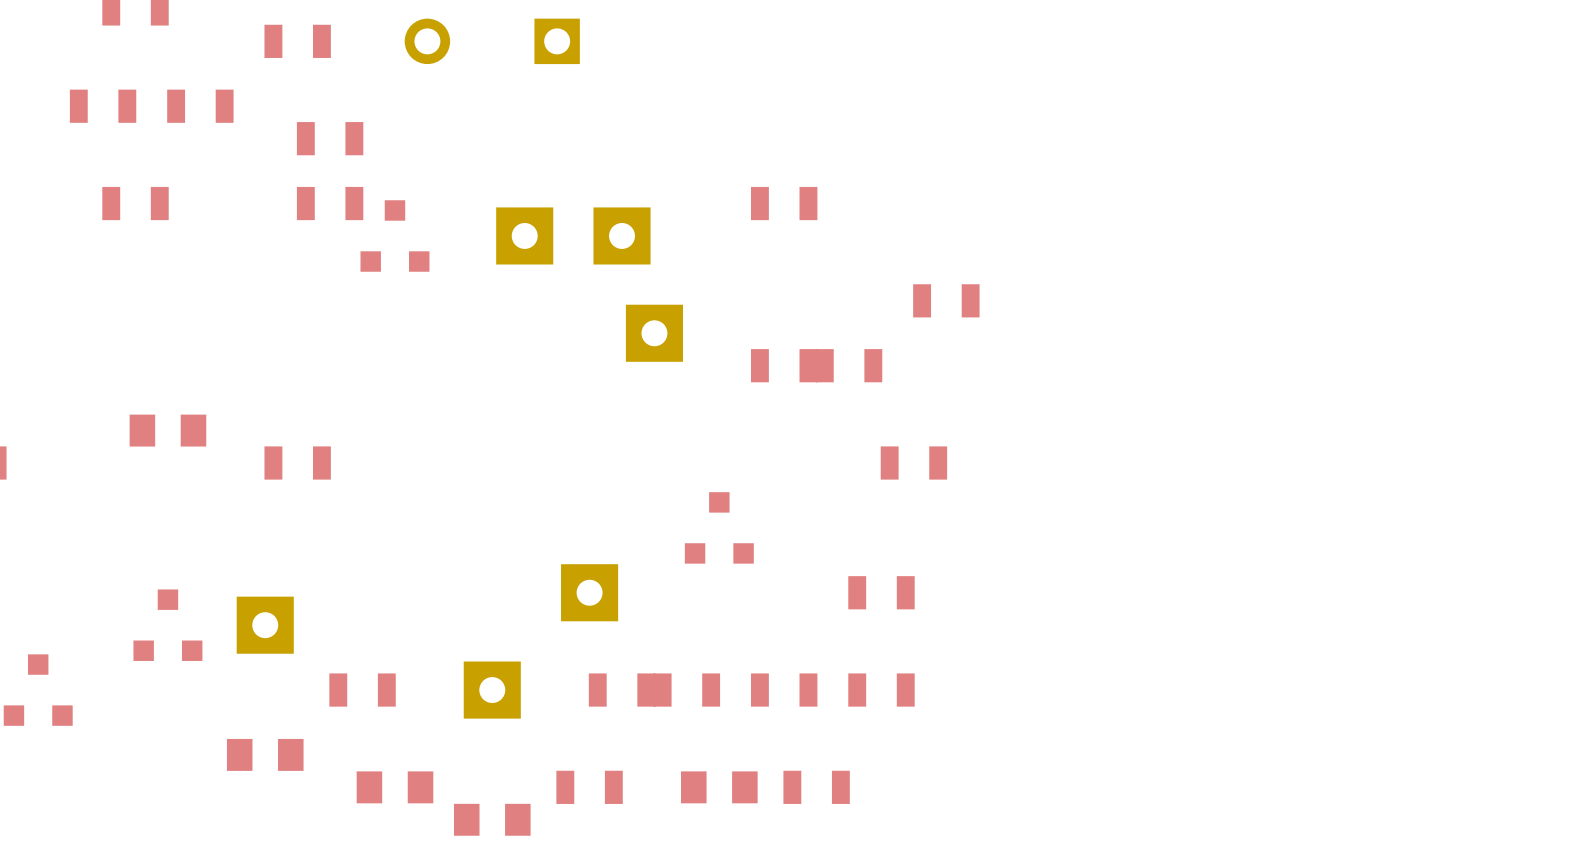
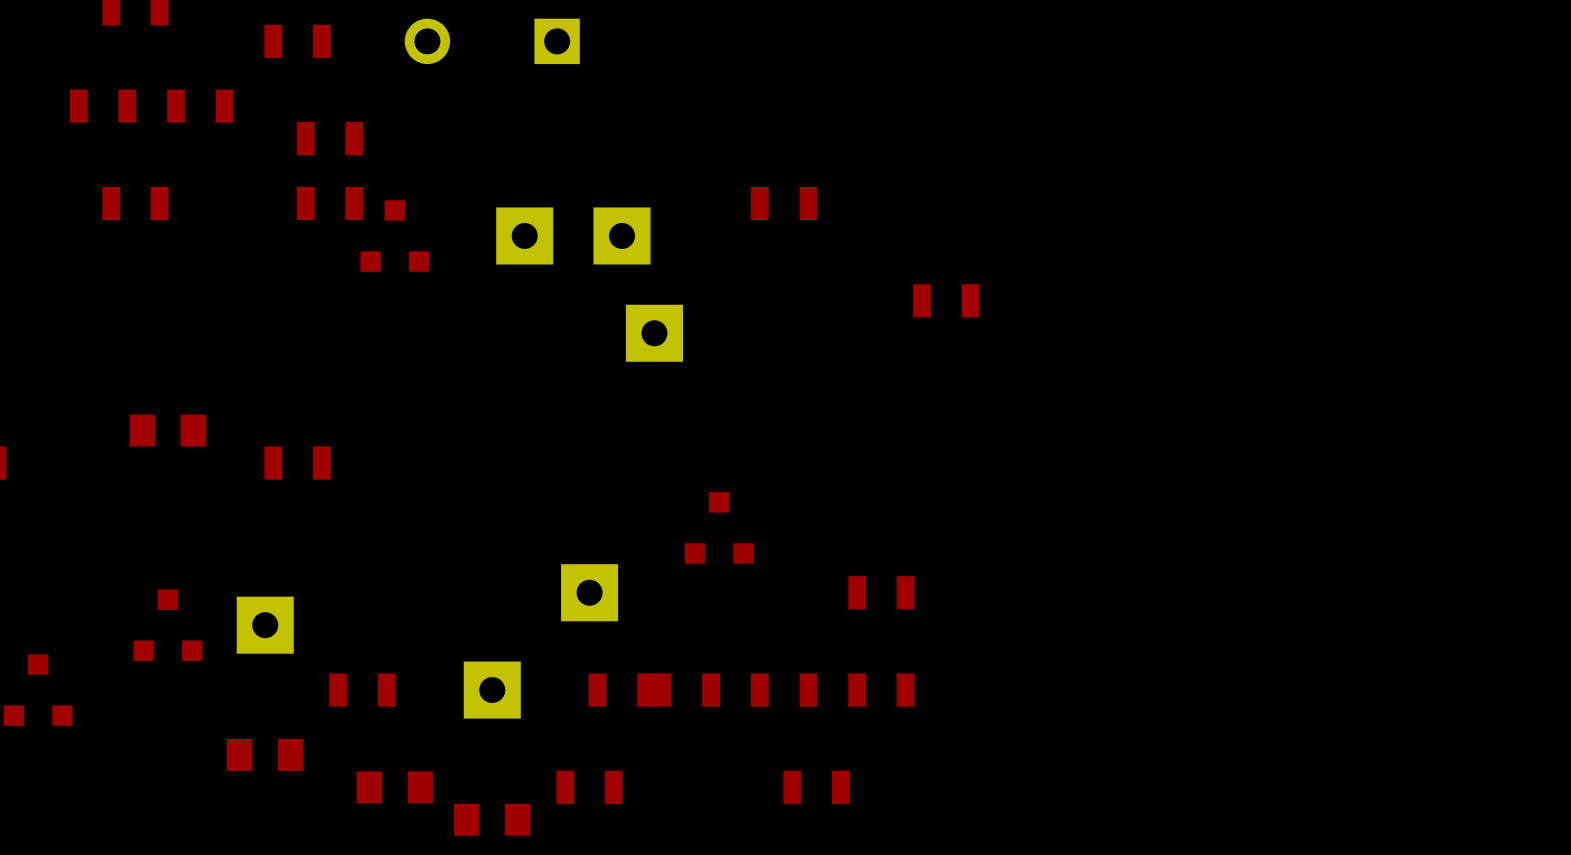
part: (784, 365) -> none
part: (849, 365) -> none
part: (913, 463) -> none
part: (719, 787) -> none

